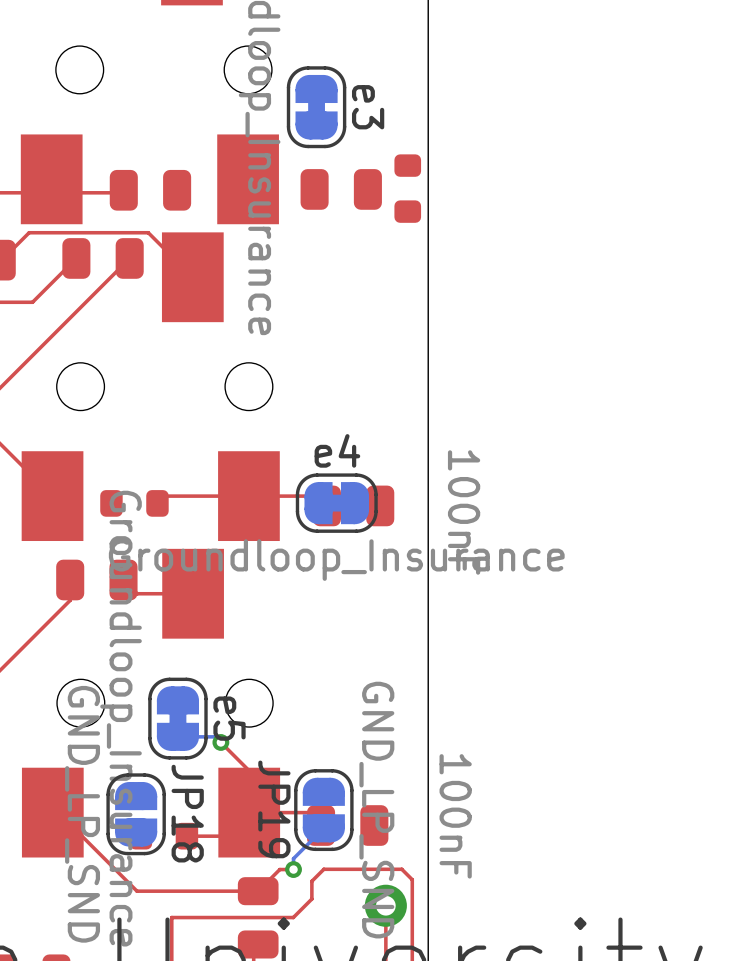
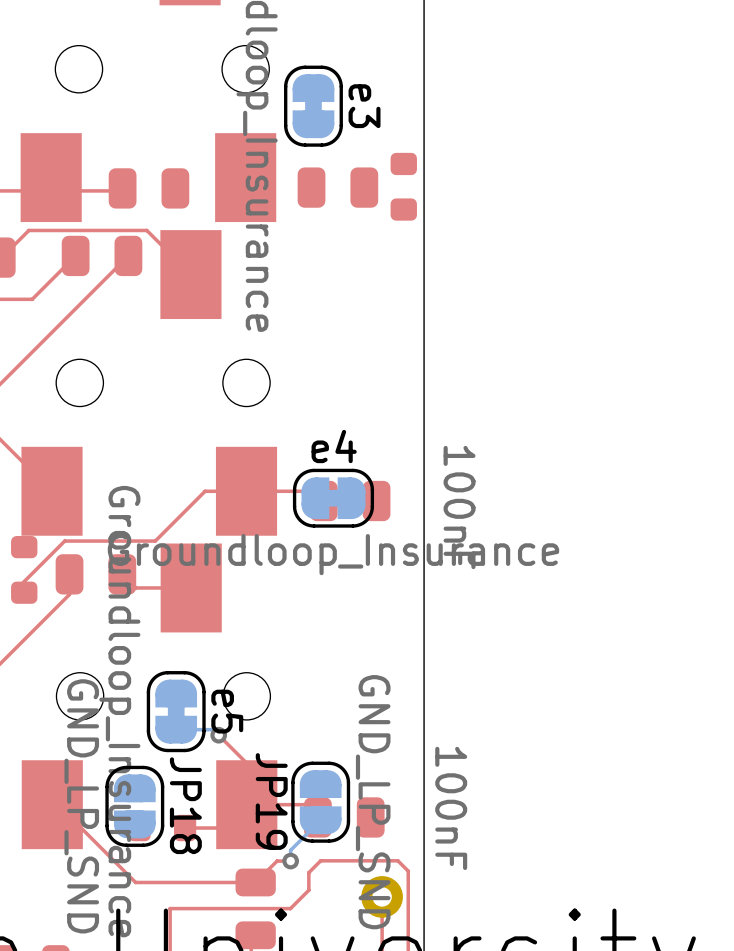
top track: (207, 496) (164, 496) (157, 503) -> (205, 491) (155, 541) (64, 541) (24, 581) (24, 592)
part rotation: 0° (134, 503) -> 90° clockwise (24, 569)
part position: (134, 503) -> (24, 569)

